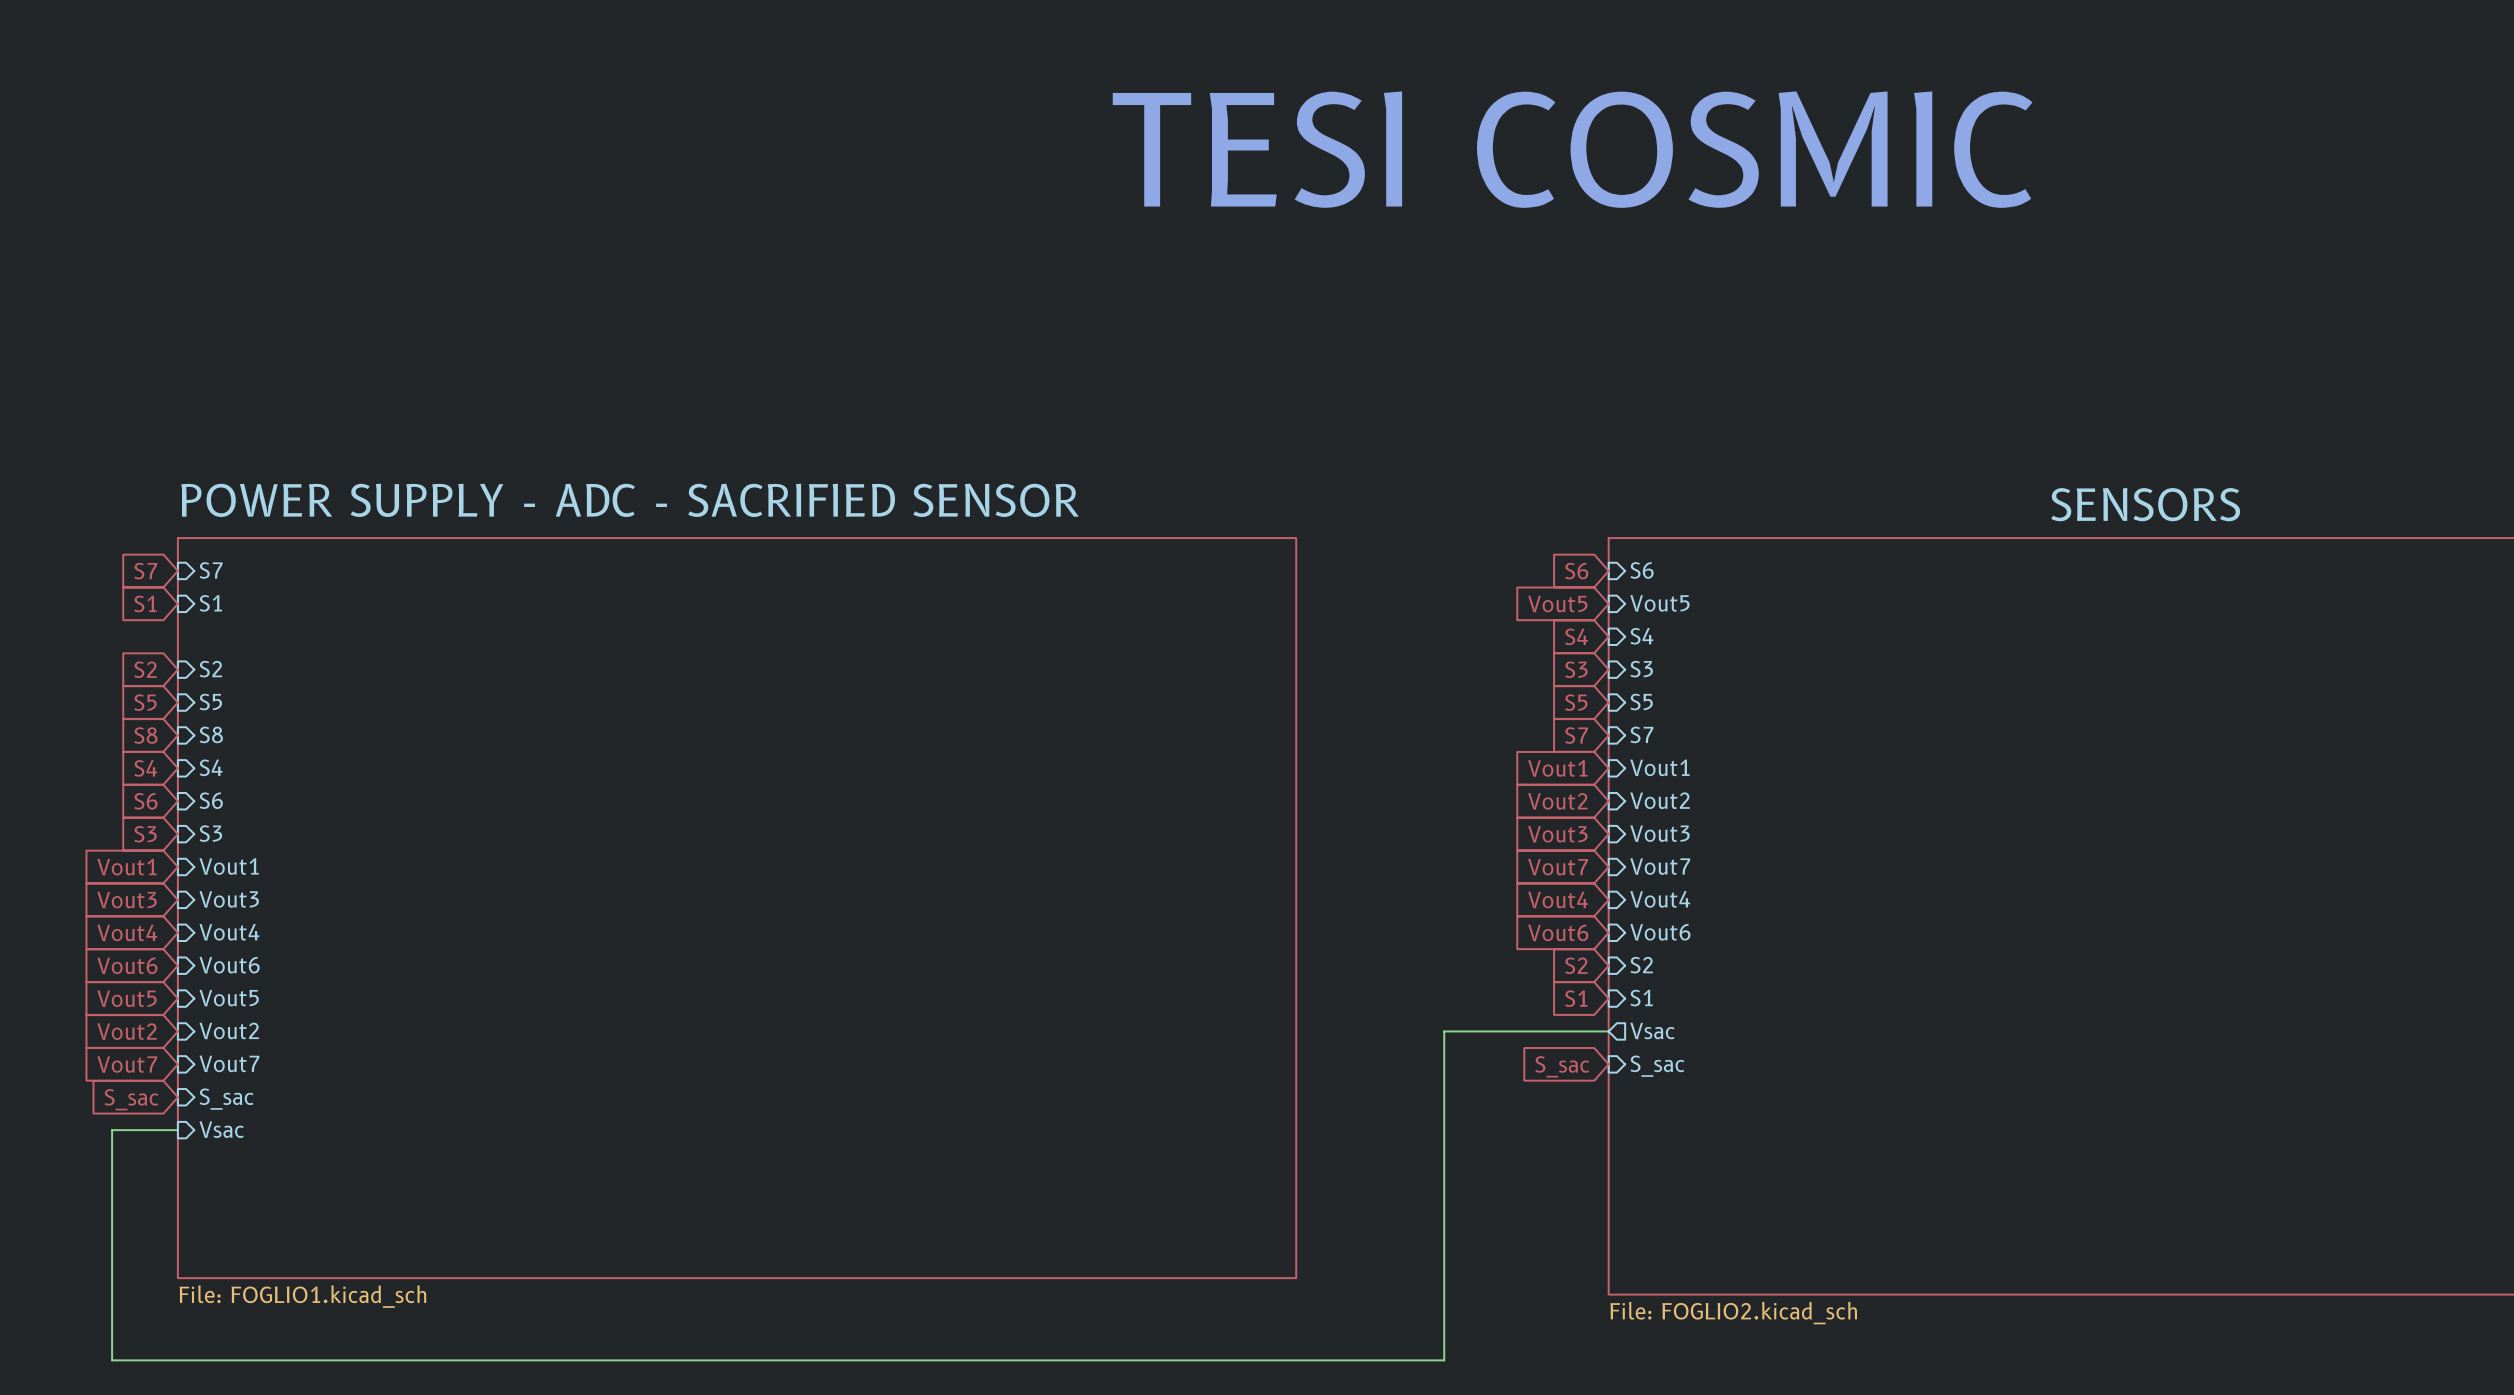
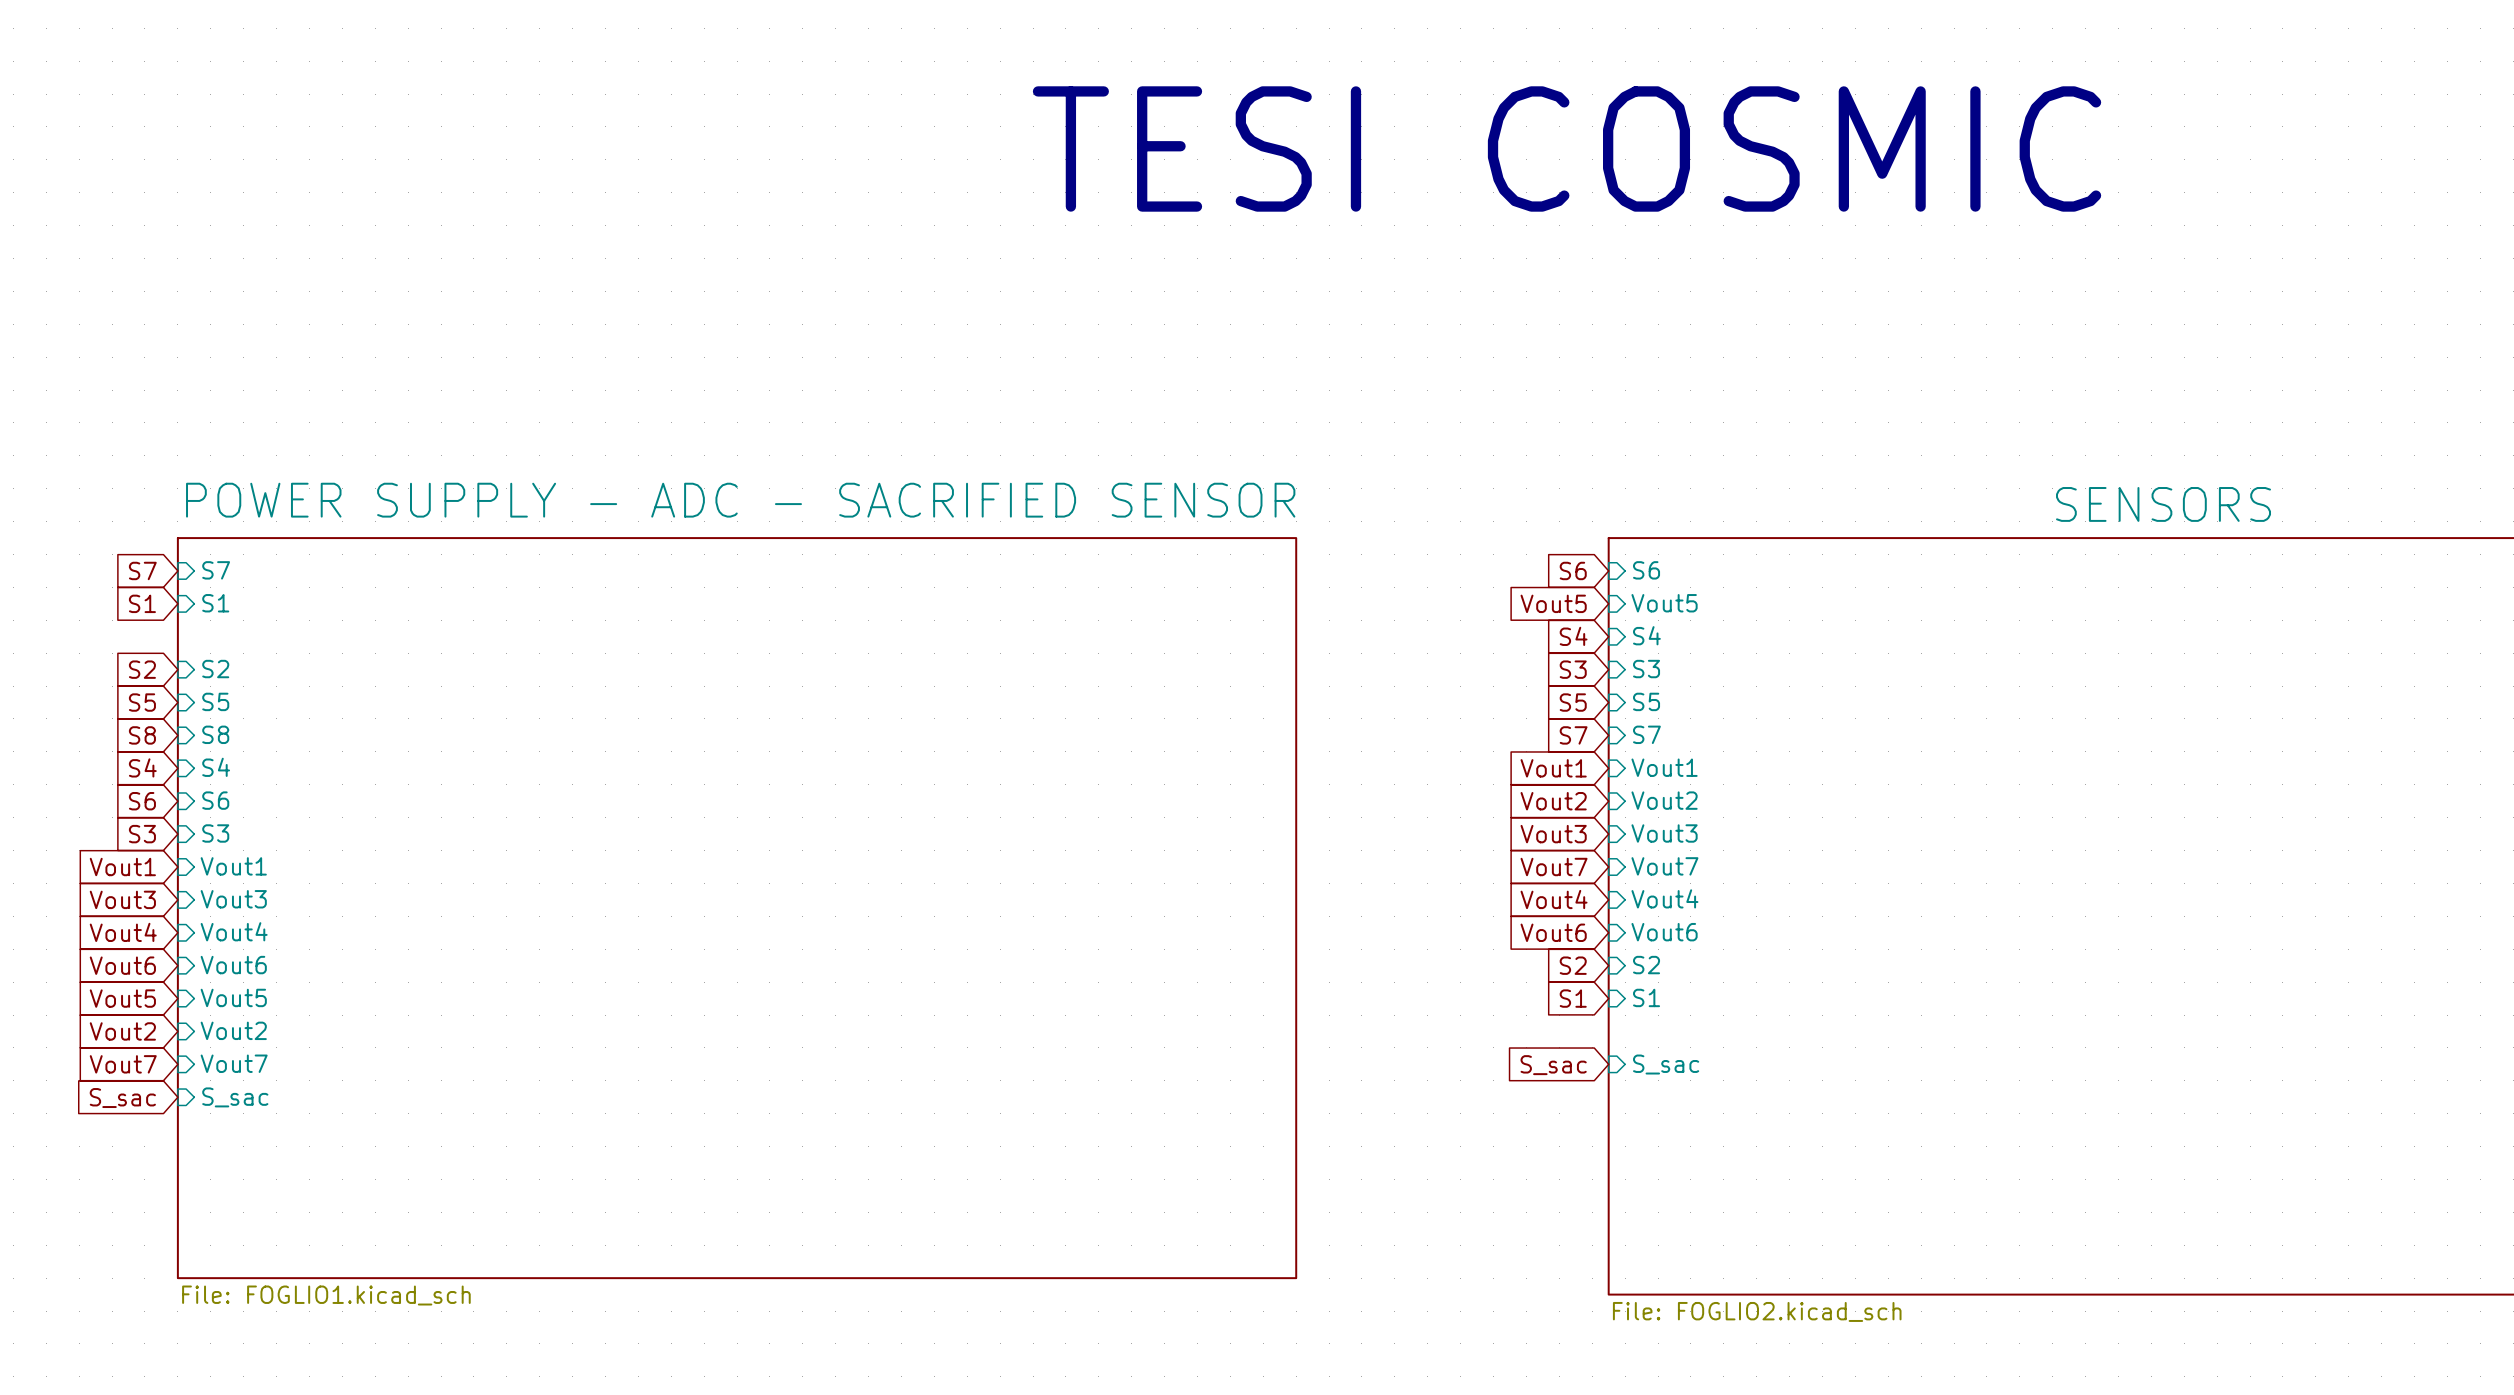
sheet pin: Vsac (1652, 1030) -> none
wire: (1608, 1031) (1444, 1031) (1444, 1360) (112, 1360) (112, 1130) (177, 1130) -> none
sheet pin: Vsac (221, 1129) -> none

